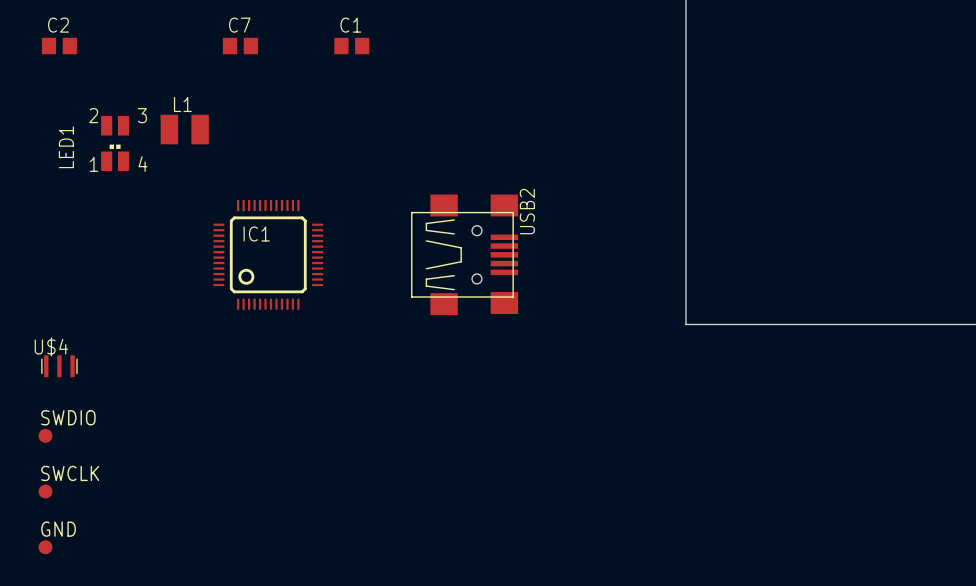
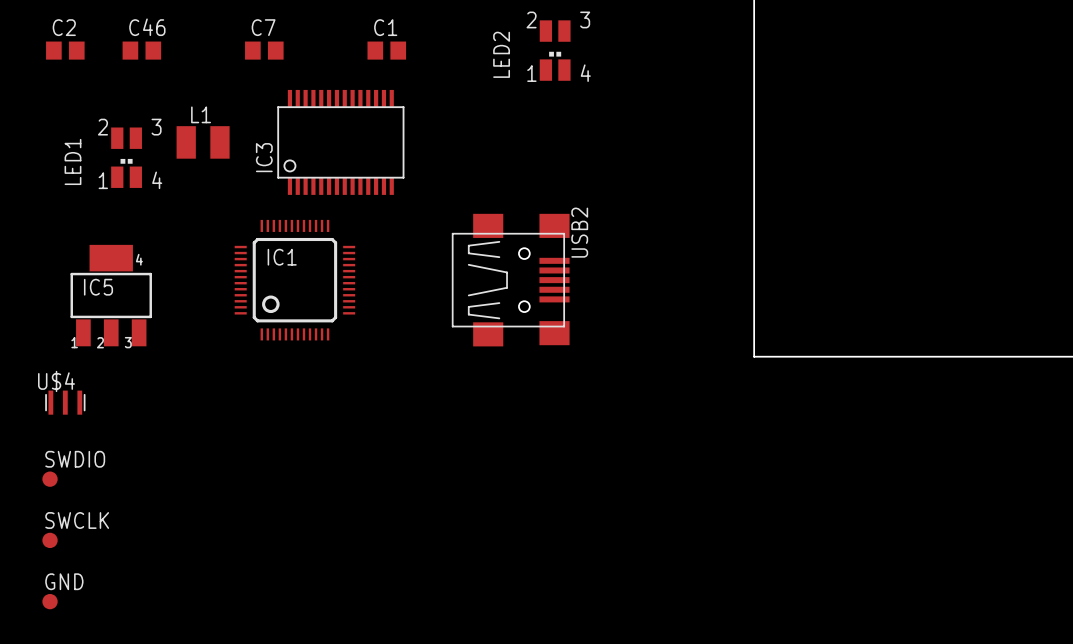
C46: none -> (141, 50)
LED2: none -> (555, 50)
IC3: none -> (340, 142)
IC5: none -> (111, 295)

